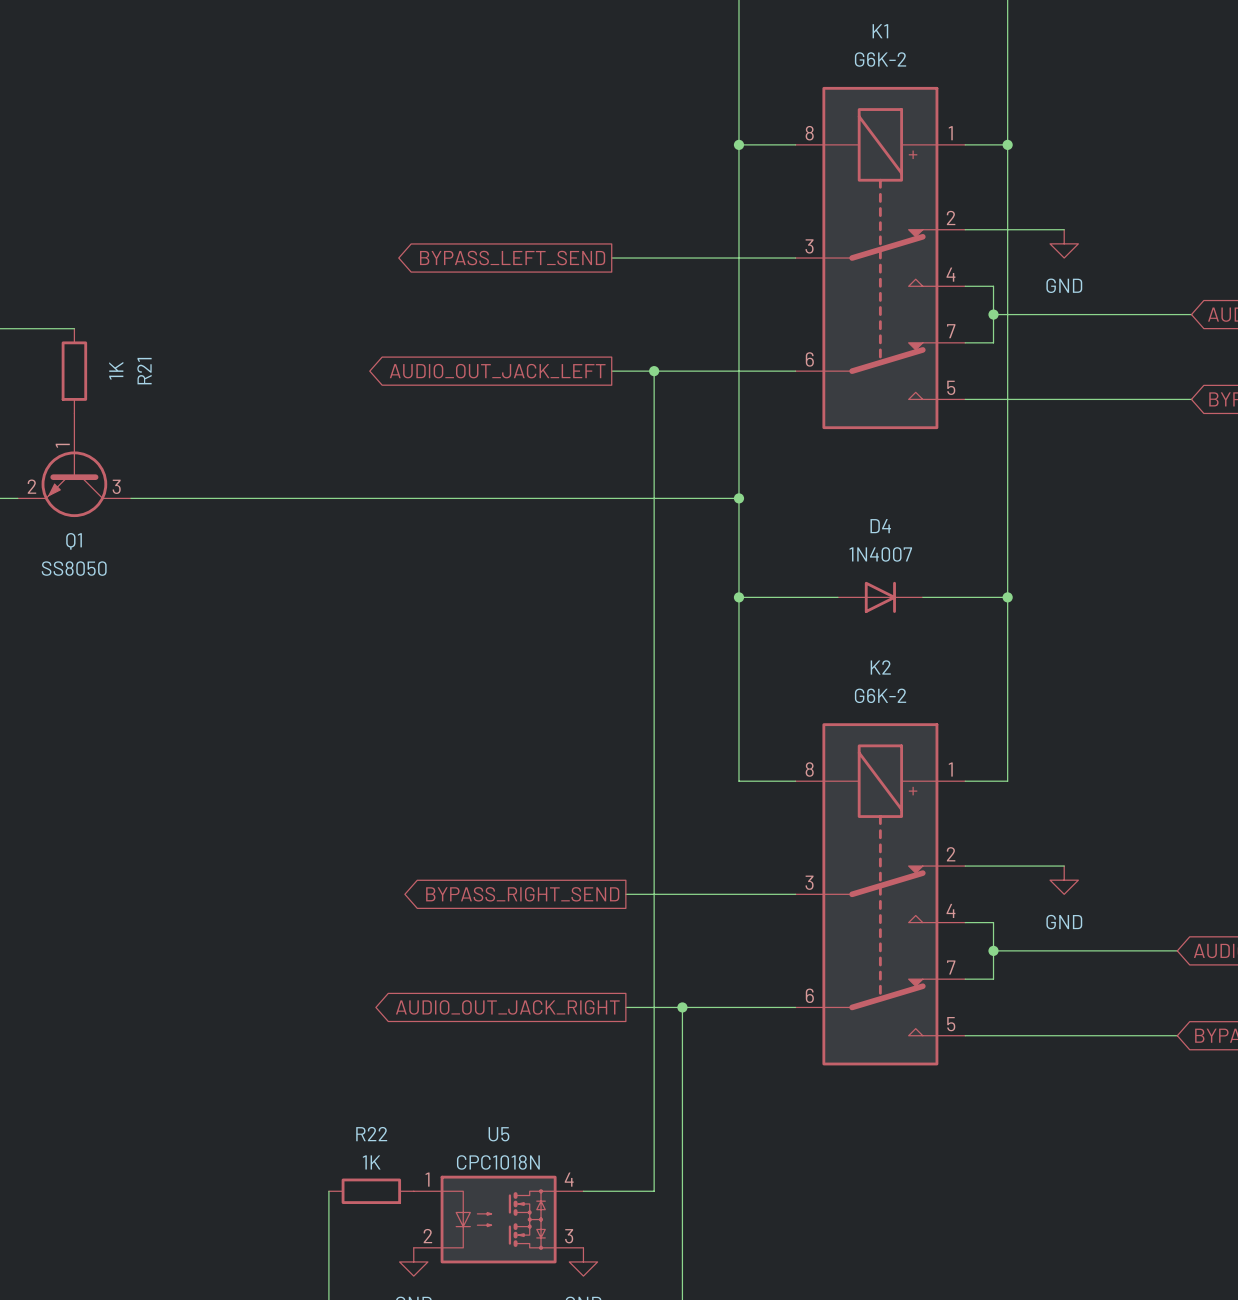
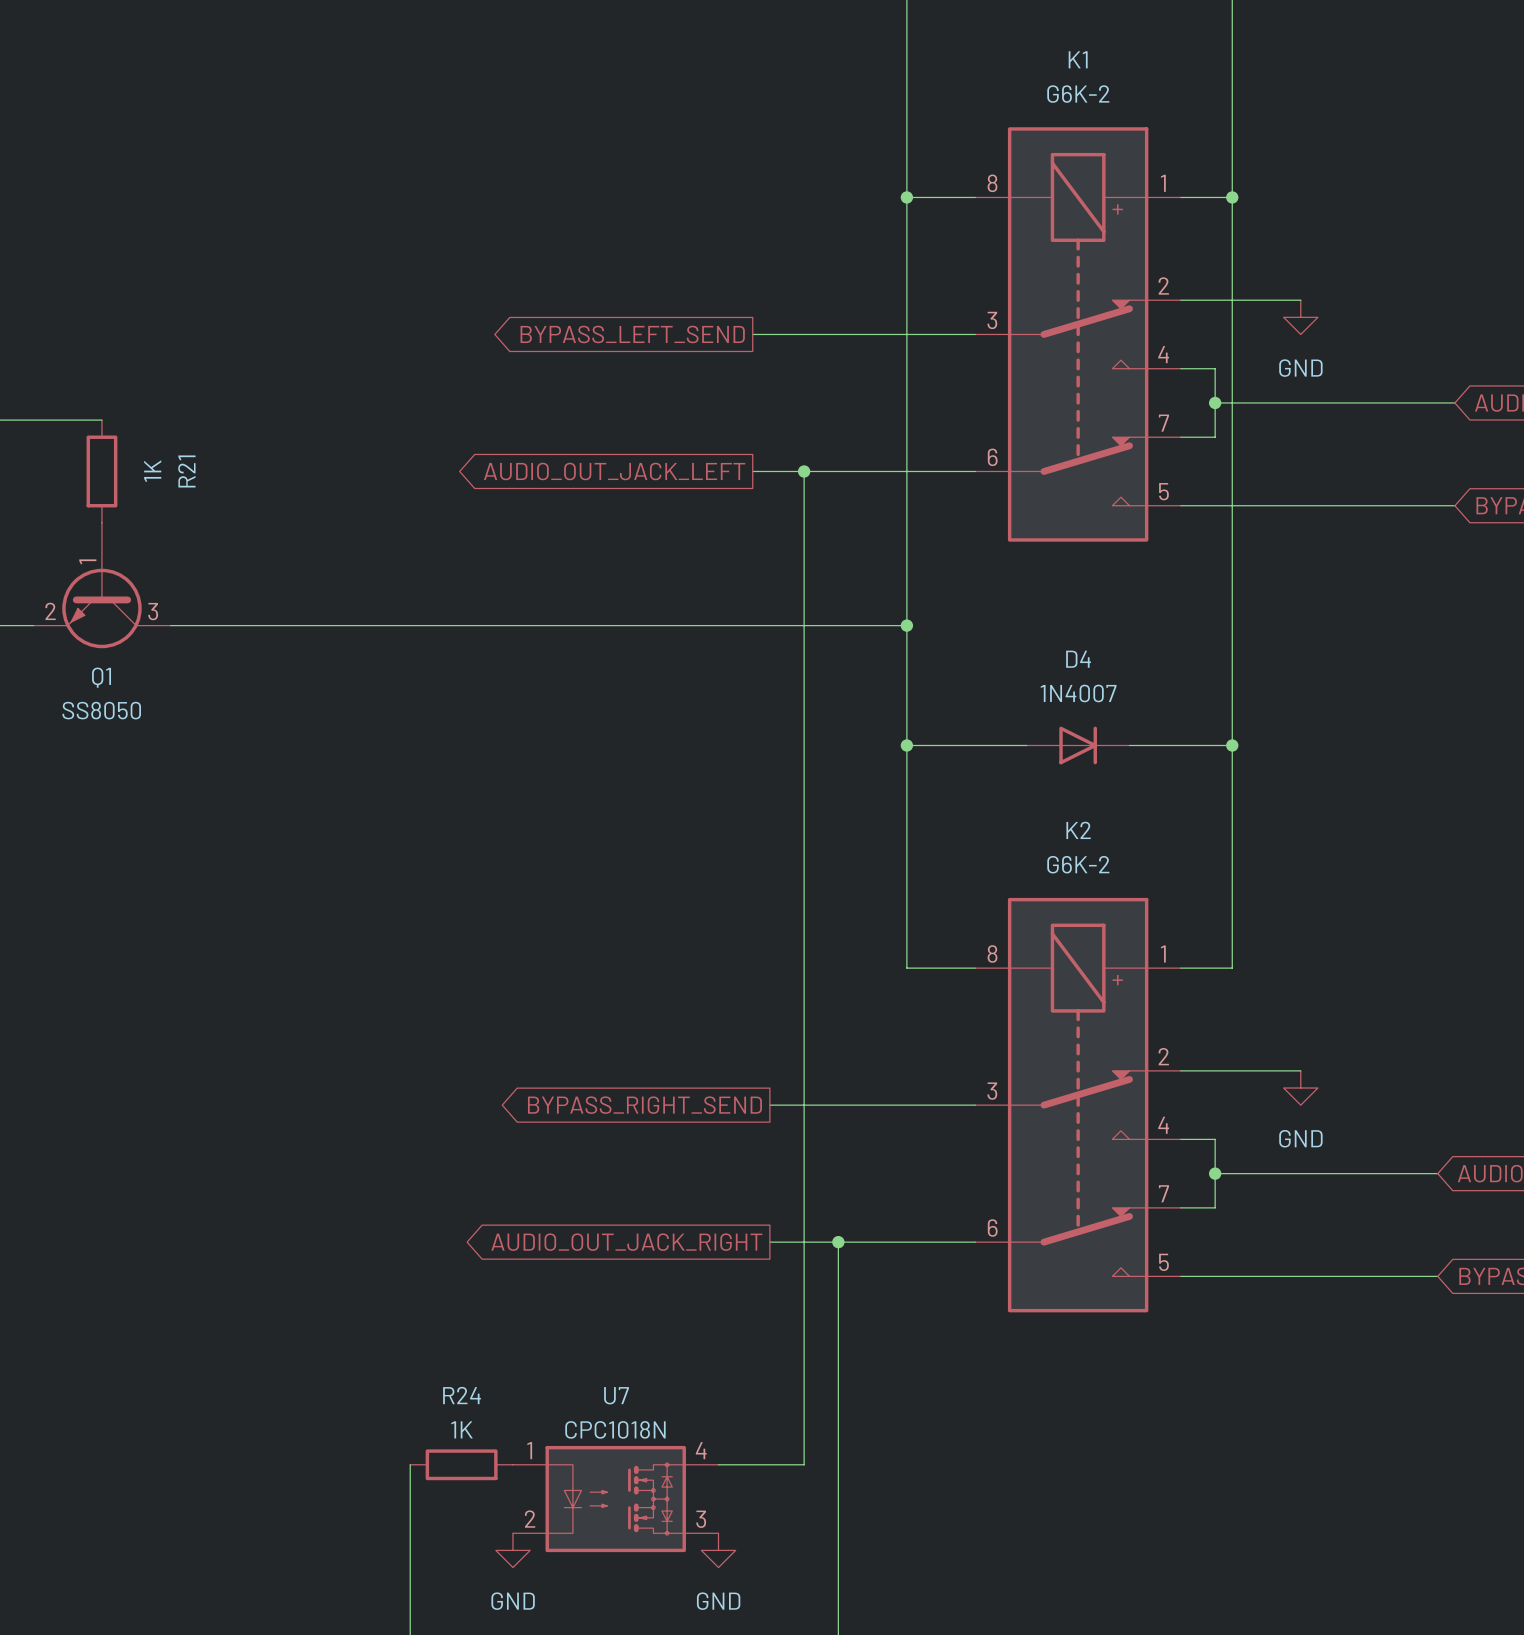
R22 name: R22 (371, 1134) -> R24 (462, 1395)
U5 name: U5 (498, 1134) -> U7 (616, 1395)

